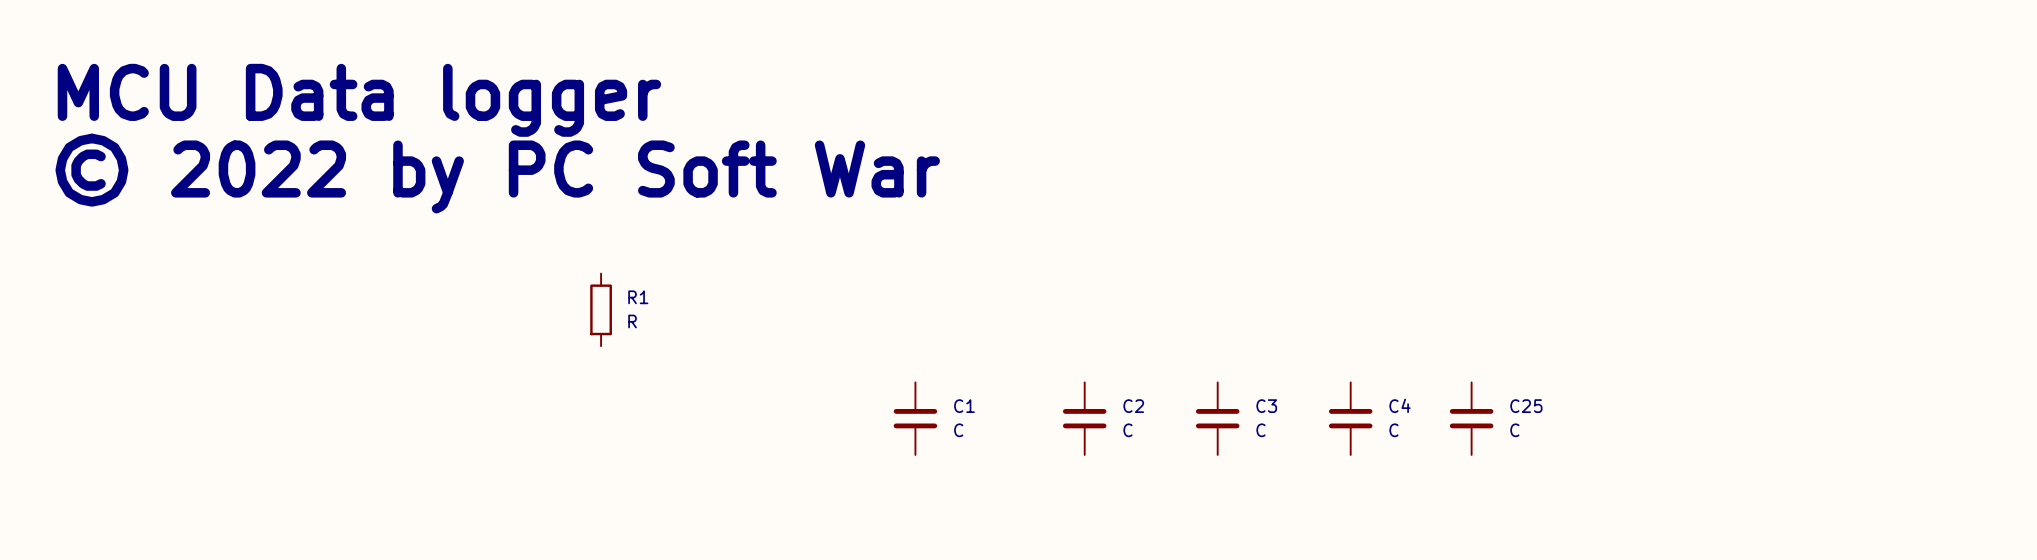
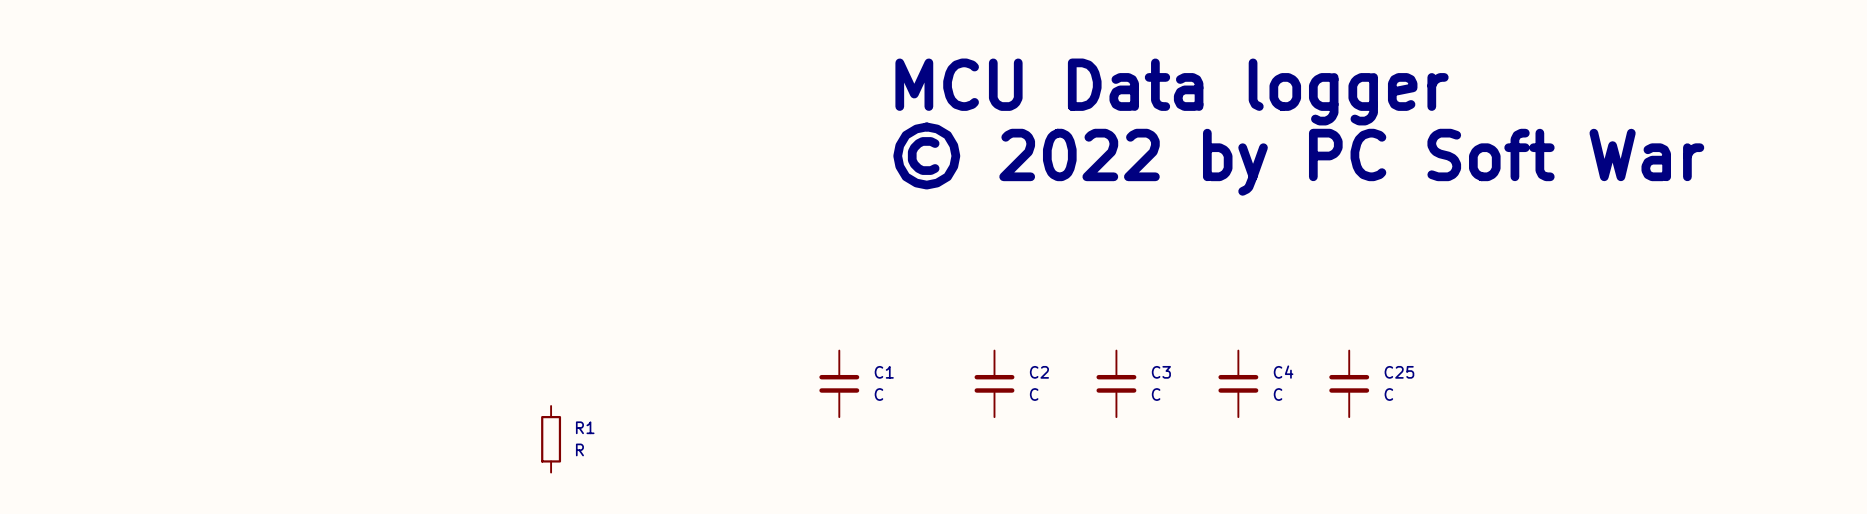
text: MCU Data logger (359, 100) -> none
text: none -> MCU Data logger (1172, 91)
text: © 2022 by PC Soft War (497, 173) -> none
text: none -> © 2022 by PC Soft War (1298, 159)
R1 position: (601, 309) -> (551, 439)

